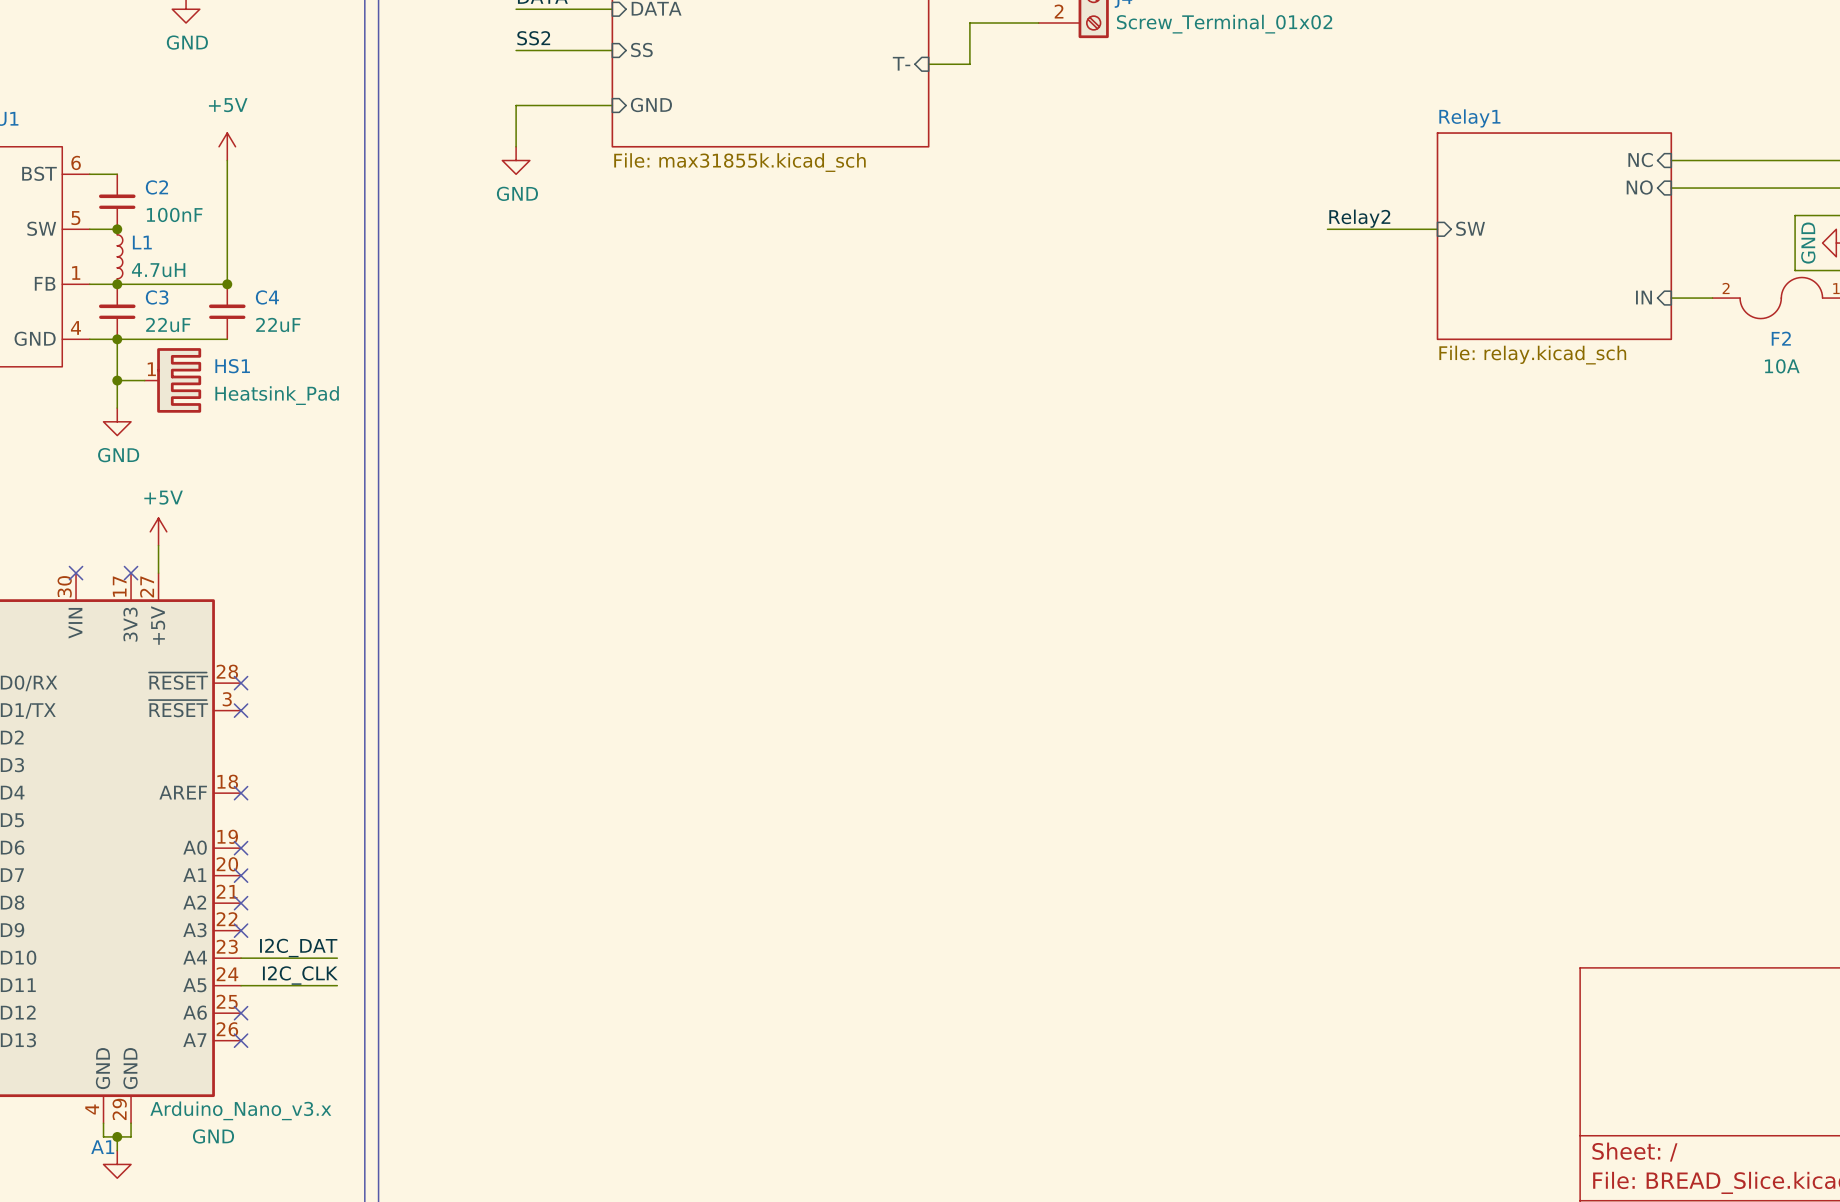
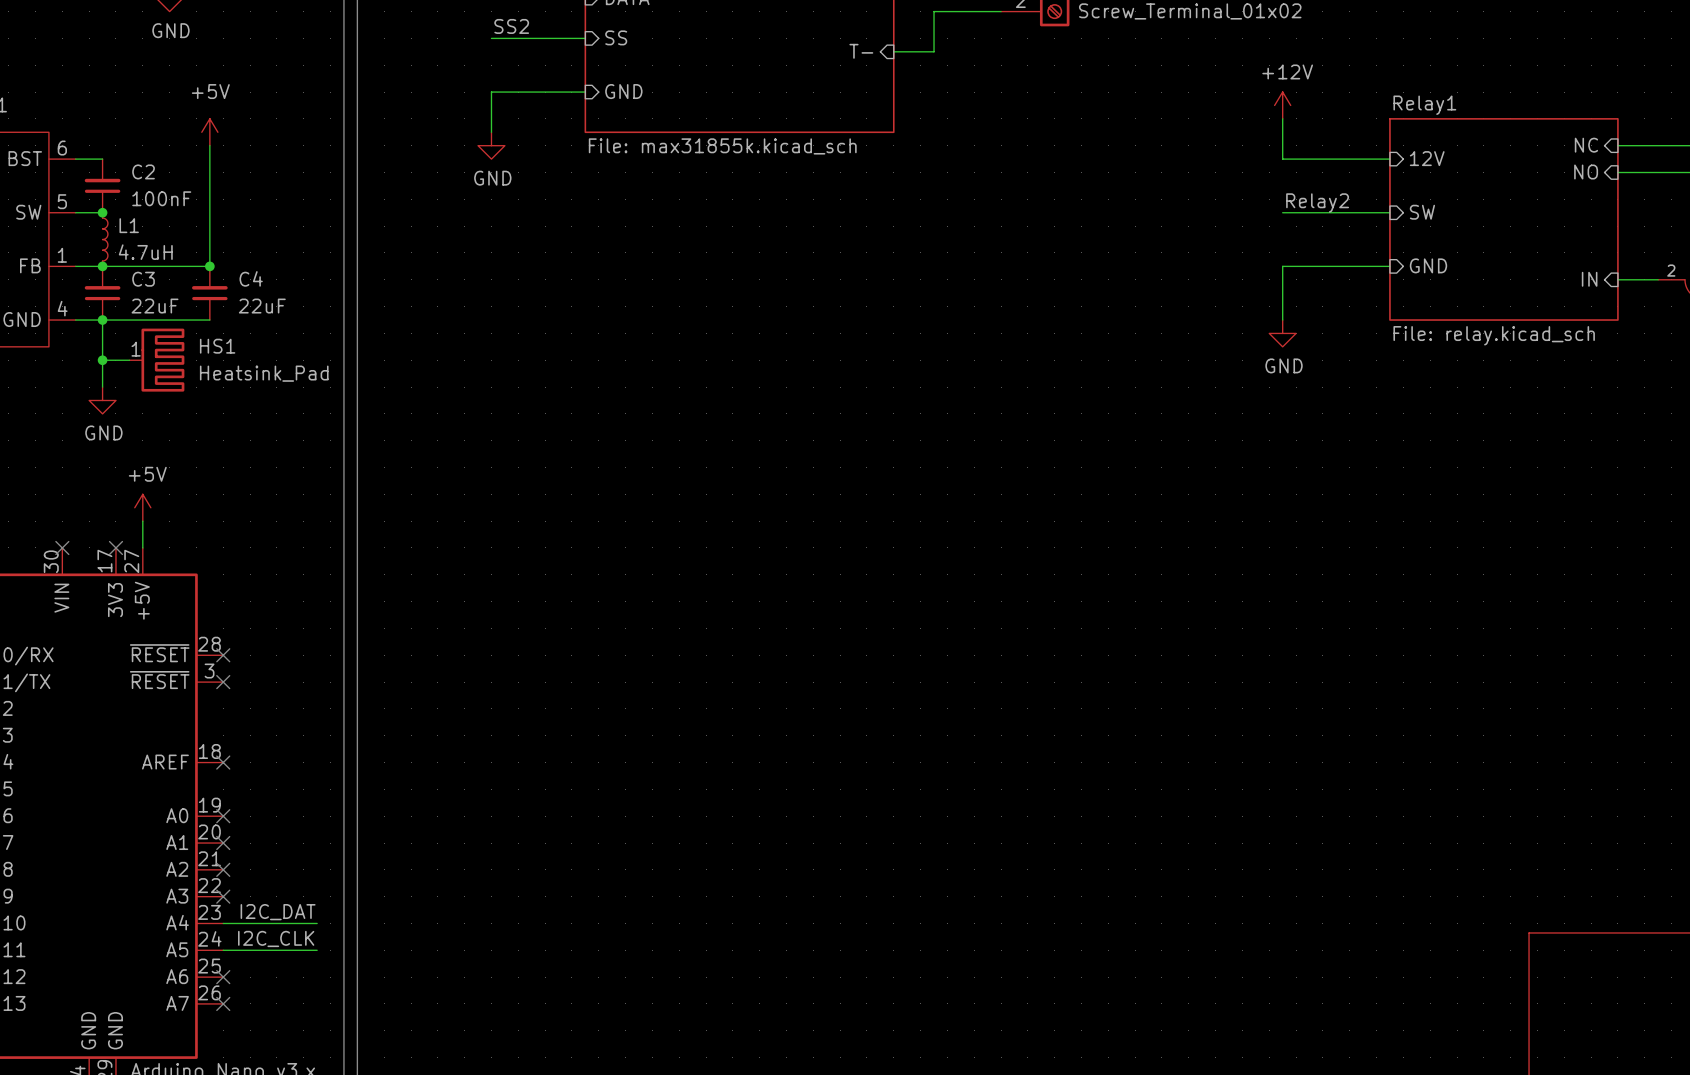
power symbol: none -> +12V (1282, 105)
wire: none -> (1282, 118) (1282, 159) (1389, 159)
sheet pin: none -> 12V (1427, 158)
sheet pin: none -> GND (1428, 265)
wire: none -> (1389, 266) (1282, 266) (1282, 320)
power symbol: none -> GND (1282, 333)

